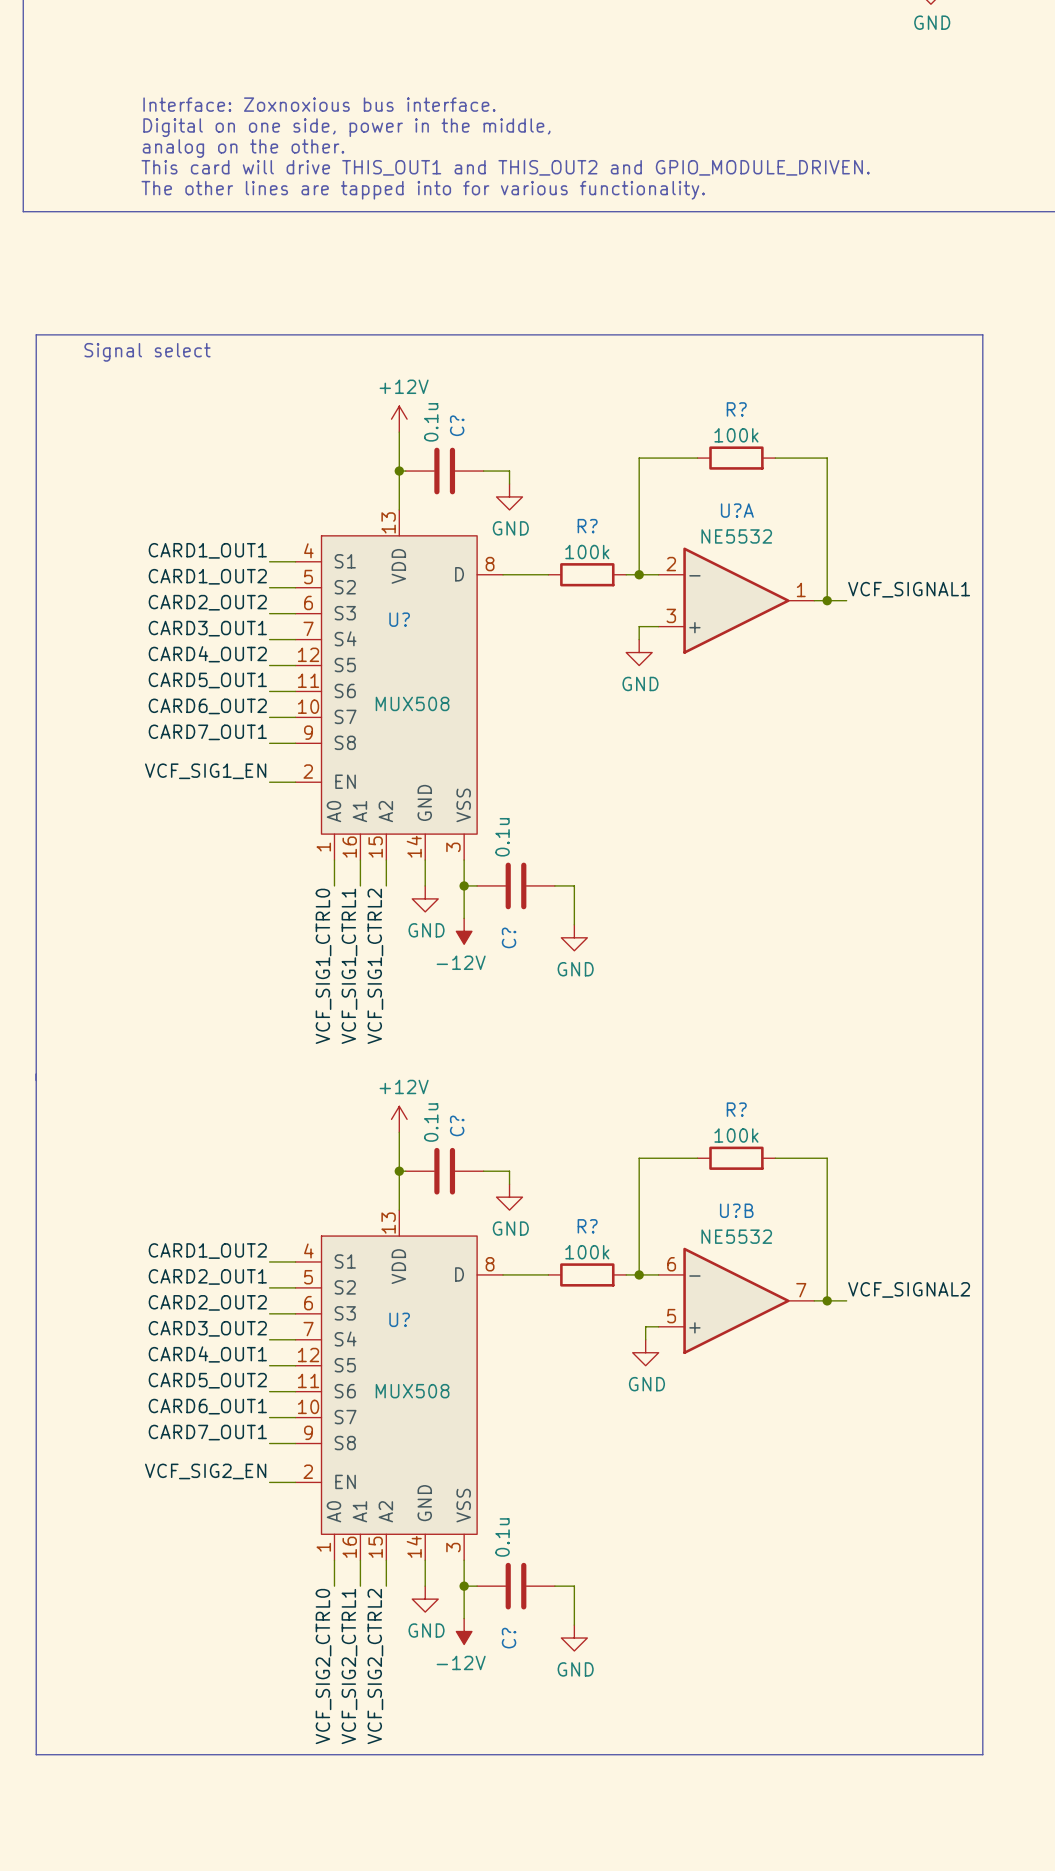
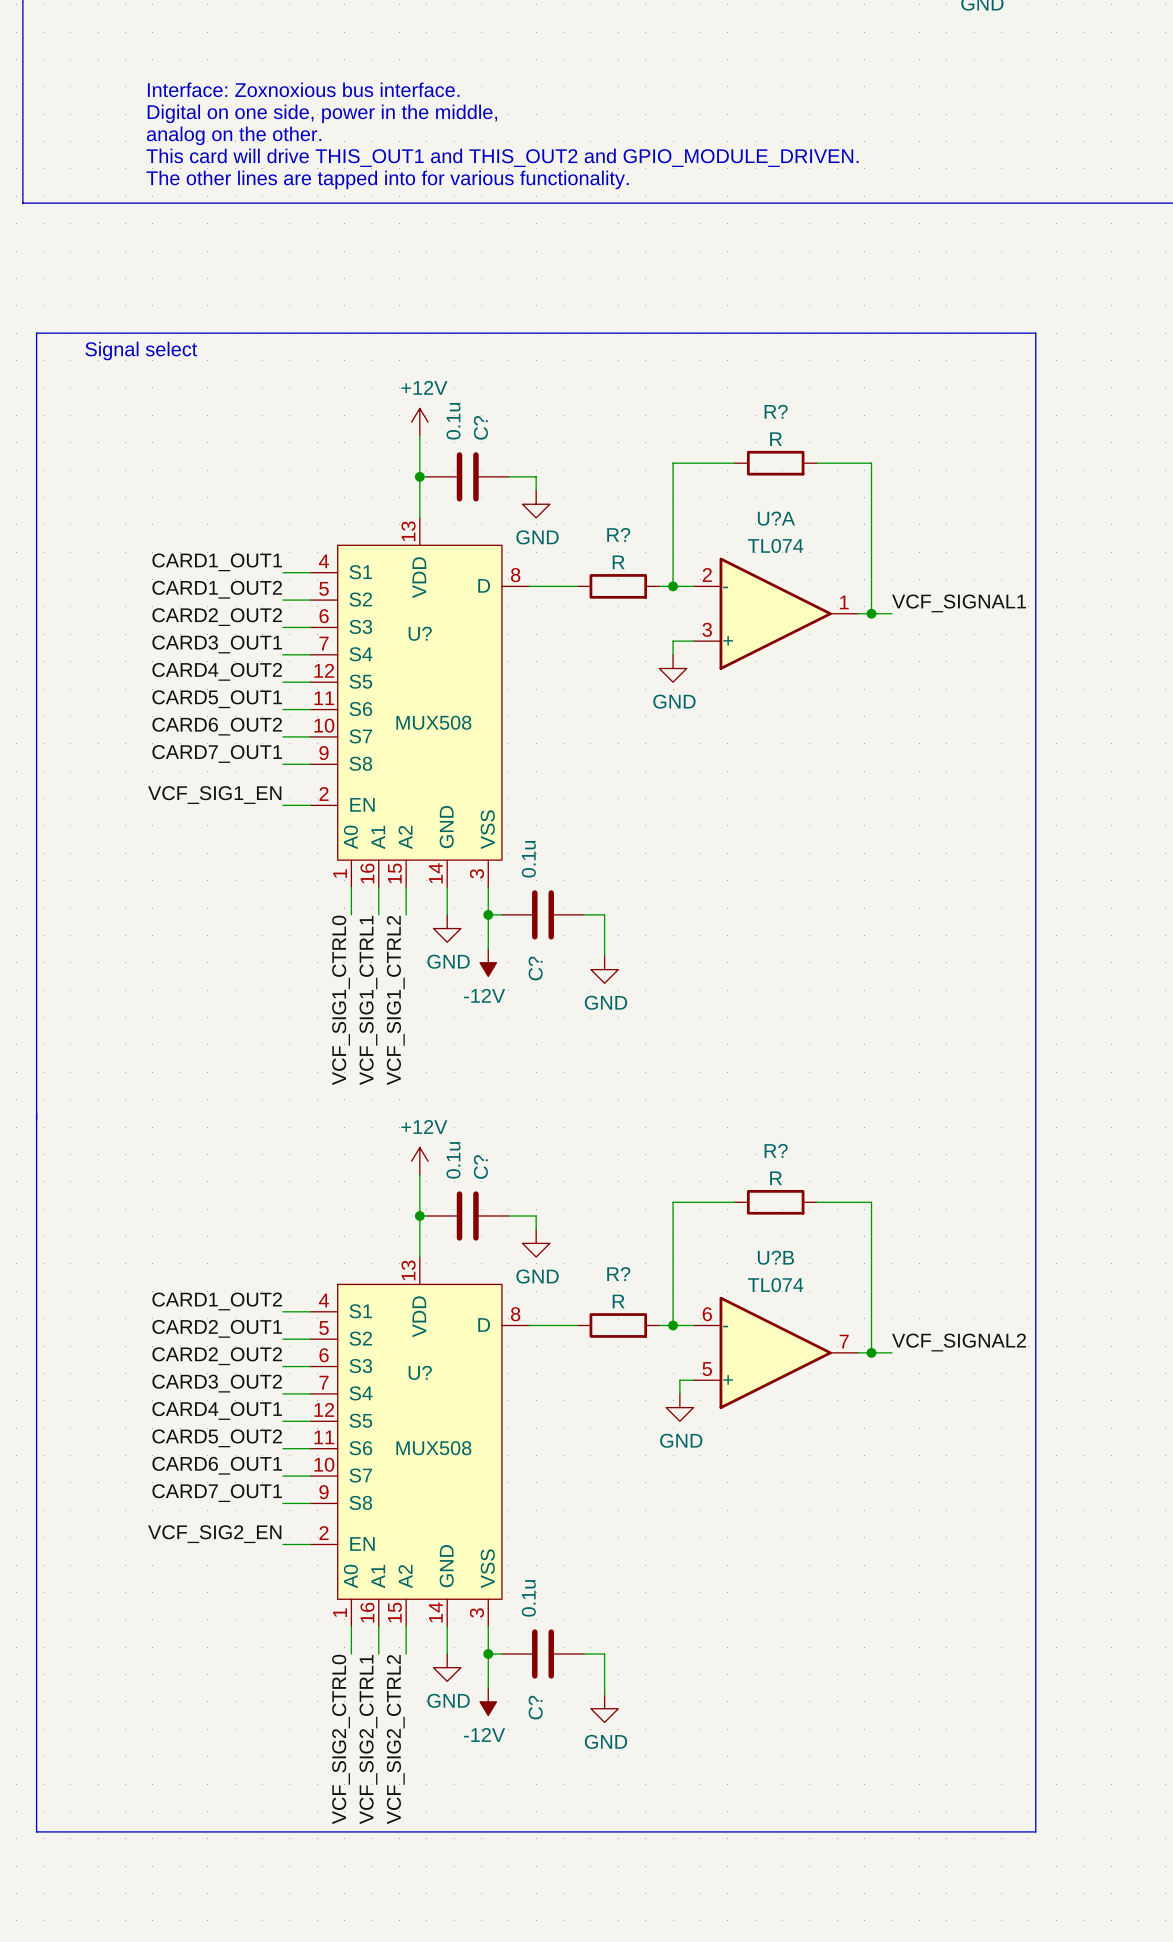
R? value: 100k (736, 435) -> R (776, 439)
U?A value: NE5532 (736, 536) -> TL074 (775, 545)
R? value: 100k (587, 552) -> R (618, 562)
R? value: 100k (736, 1135) -> R (776, 1178)
U?B value: NE5532 (736, 1236) -> TL074 (775, 1285)
R? value: 100k (587, 1252) -> R (618, 1301)

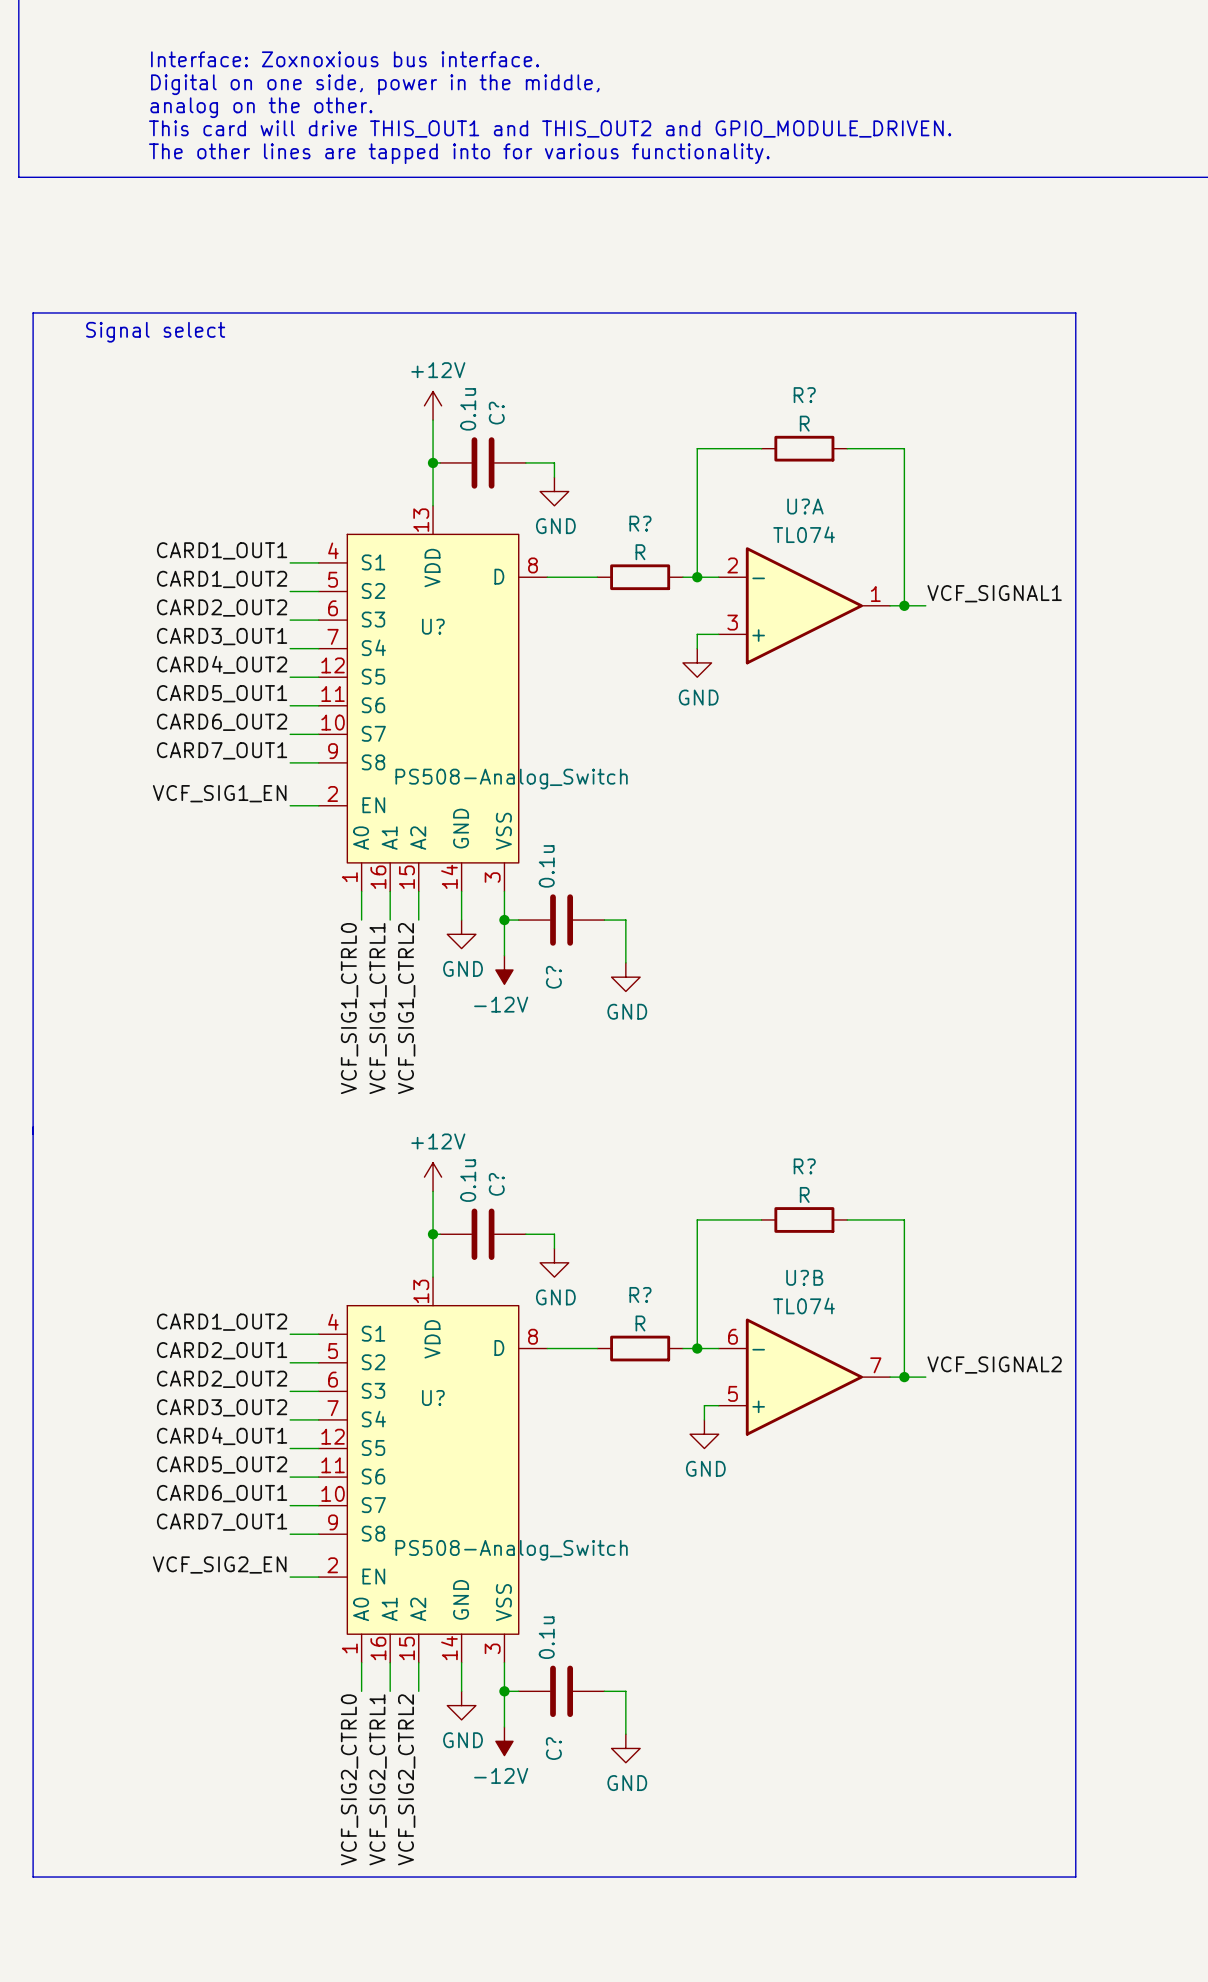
U? value: MUX508 (433, 722) -> PS508-Analog_Switch (511, 779)
U? value: MUX508 (433, 1448) -> PS508-Analog_Switch (511, 1550)

